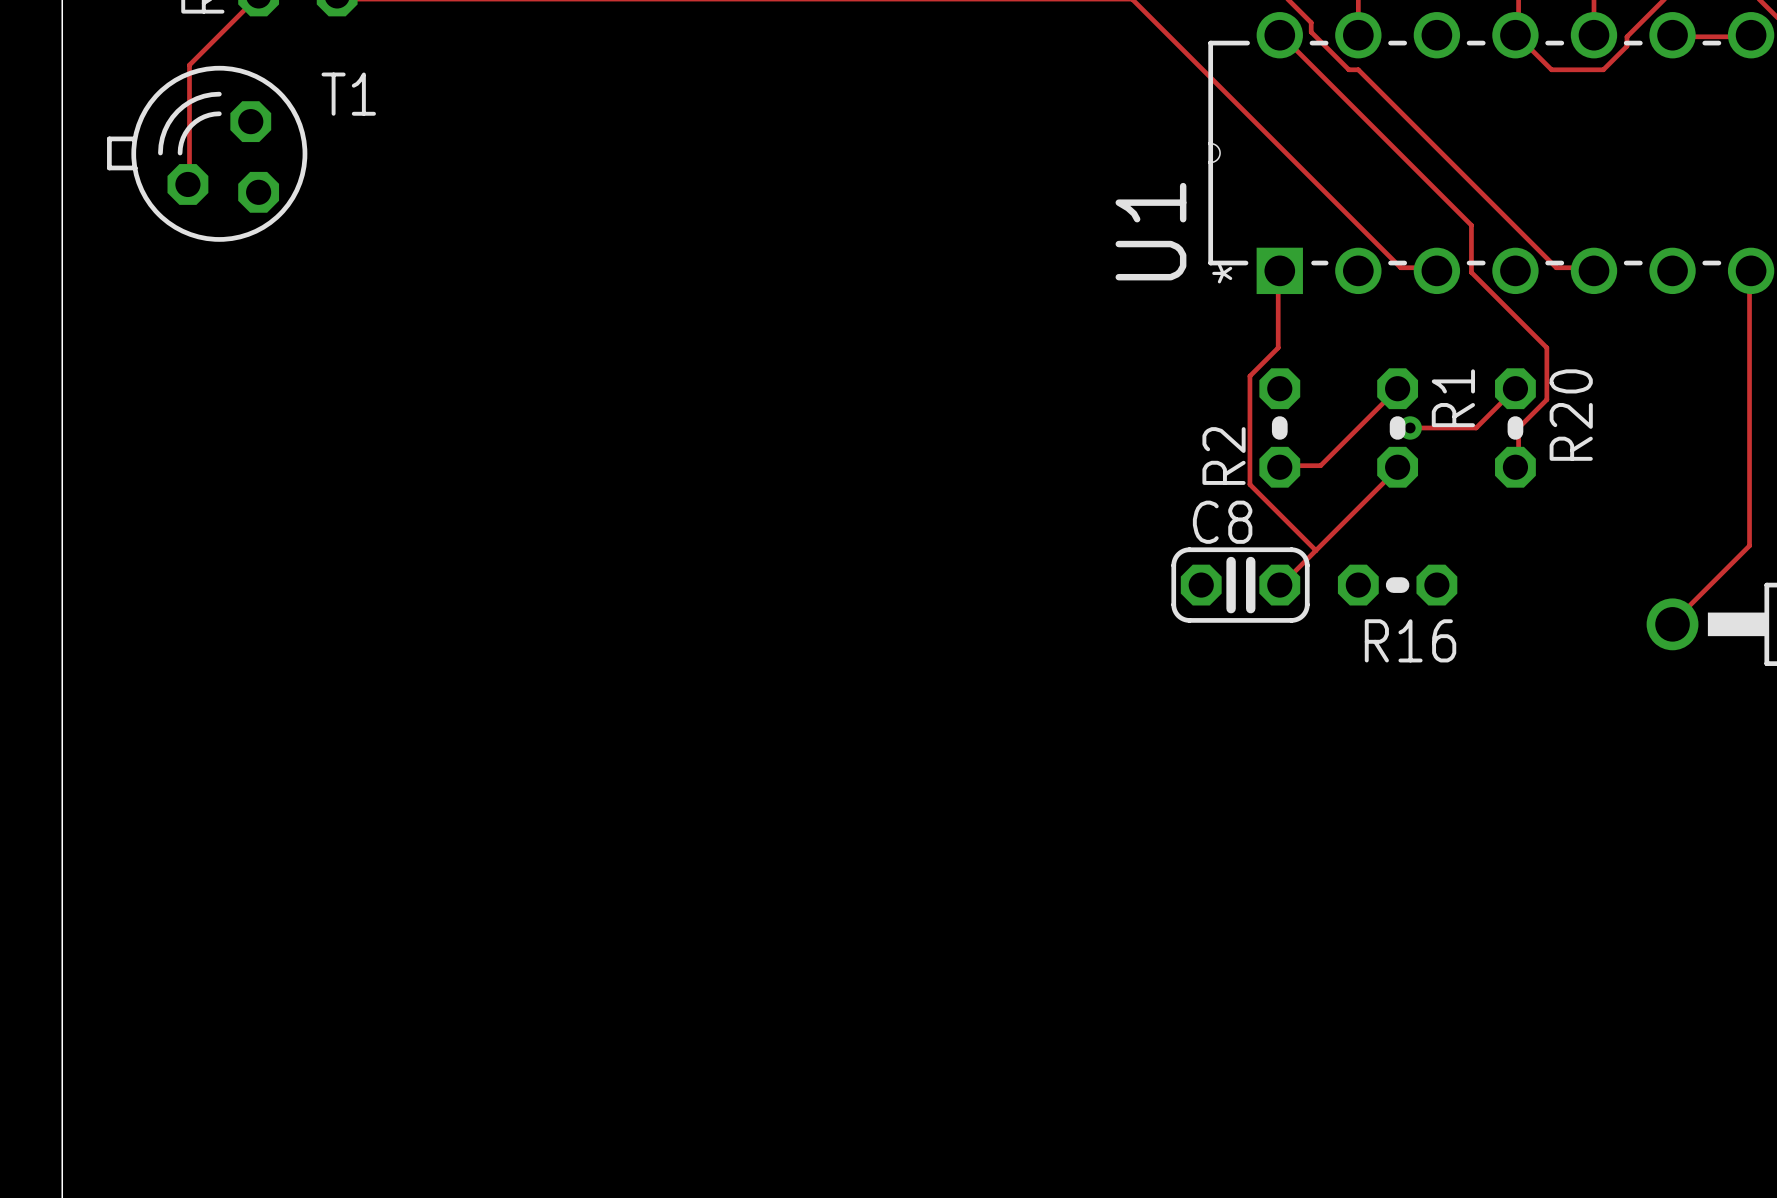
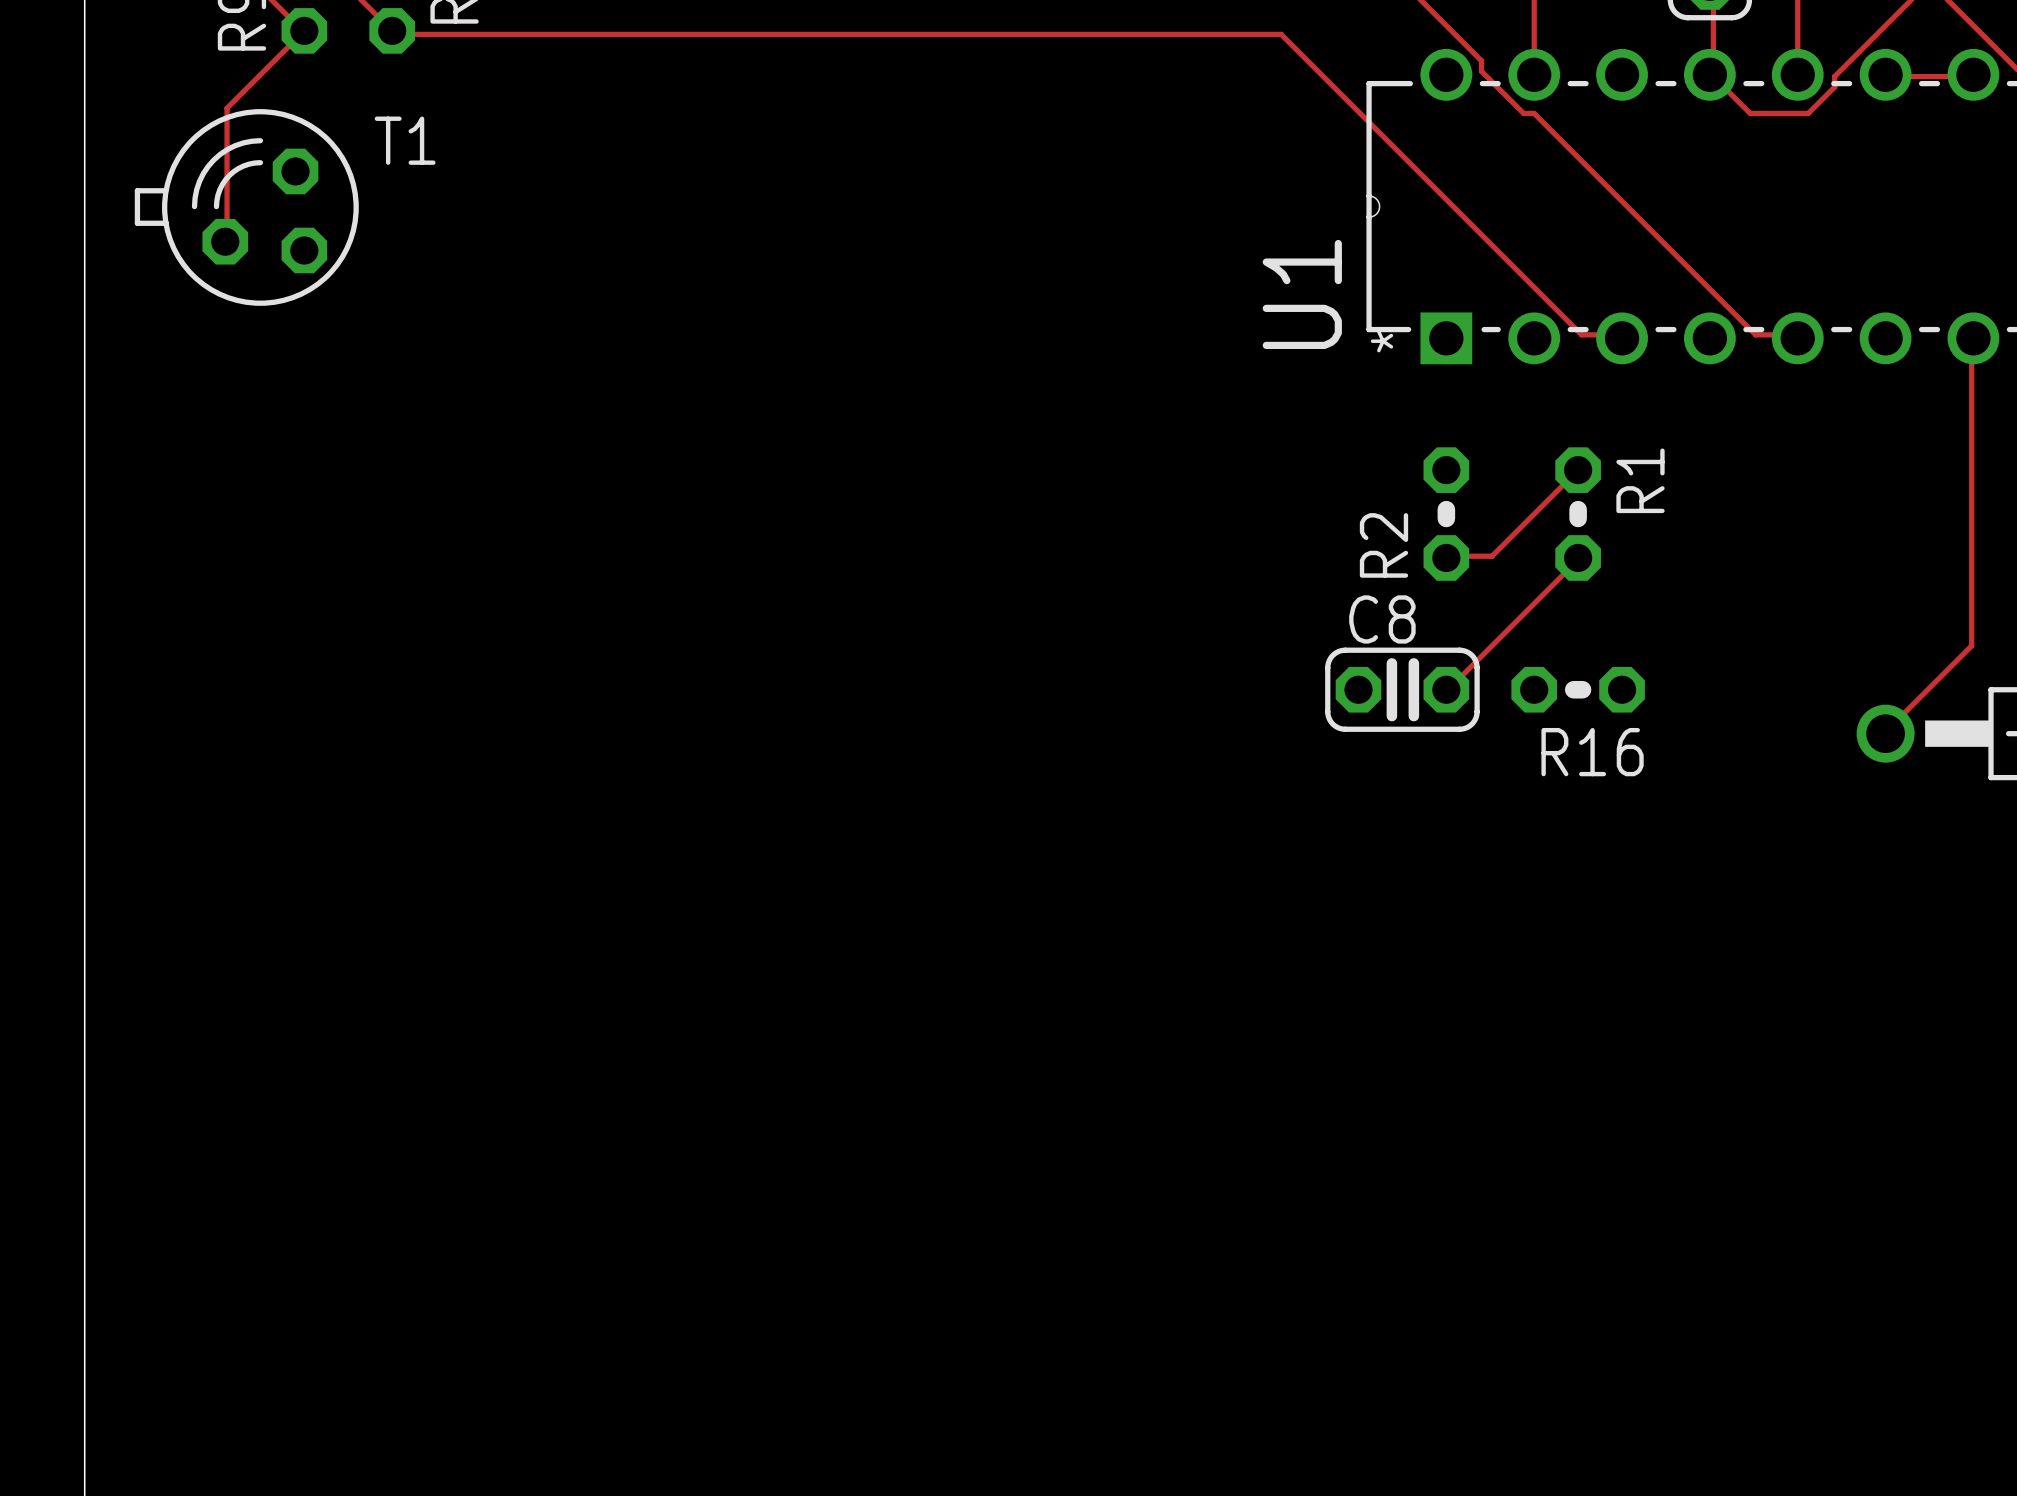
track: (1279, 35) (1471, 225) (1471, 272) (1546, 347) (1546, 399) (1518, 427) (1518, 465) (1515, 467) -> none
track: (1279, 270) (1278, 272) (1278, 347) (1249, 376) (1249, 484) (1315, 550) -> none
track: (1515, 388) (1476, 427) (1410, 427) -> none
via: (1410, 427) -> none
R20: (1515, 427) -> none

